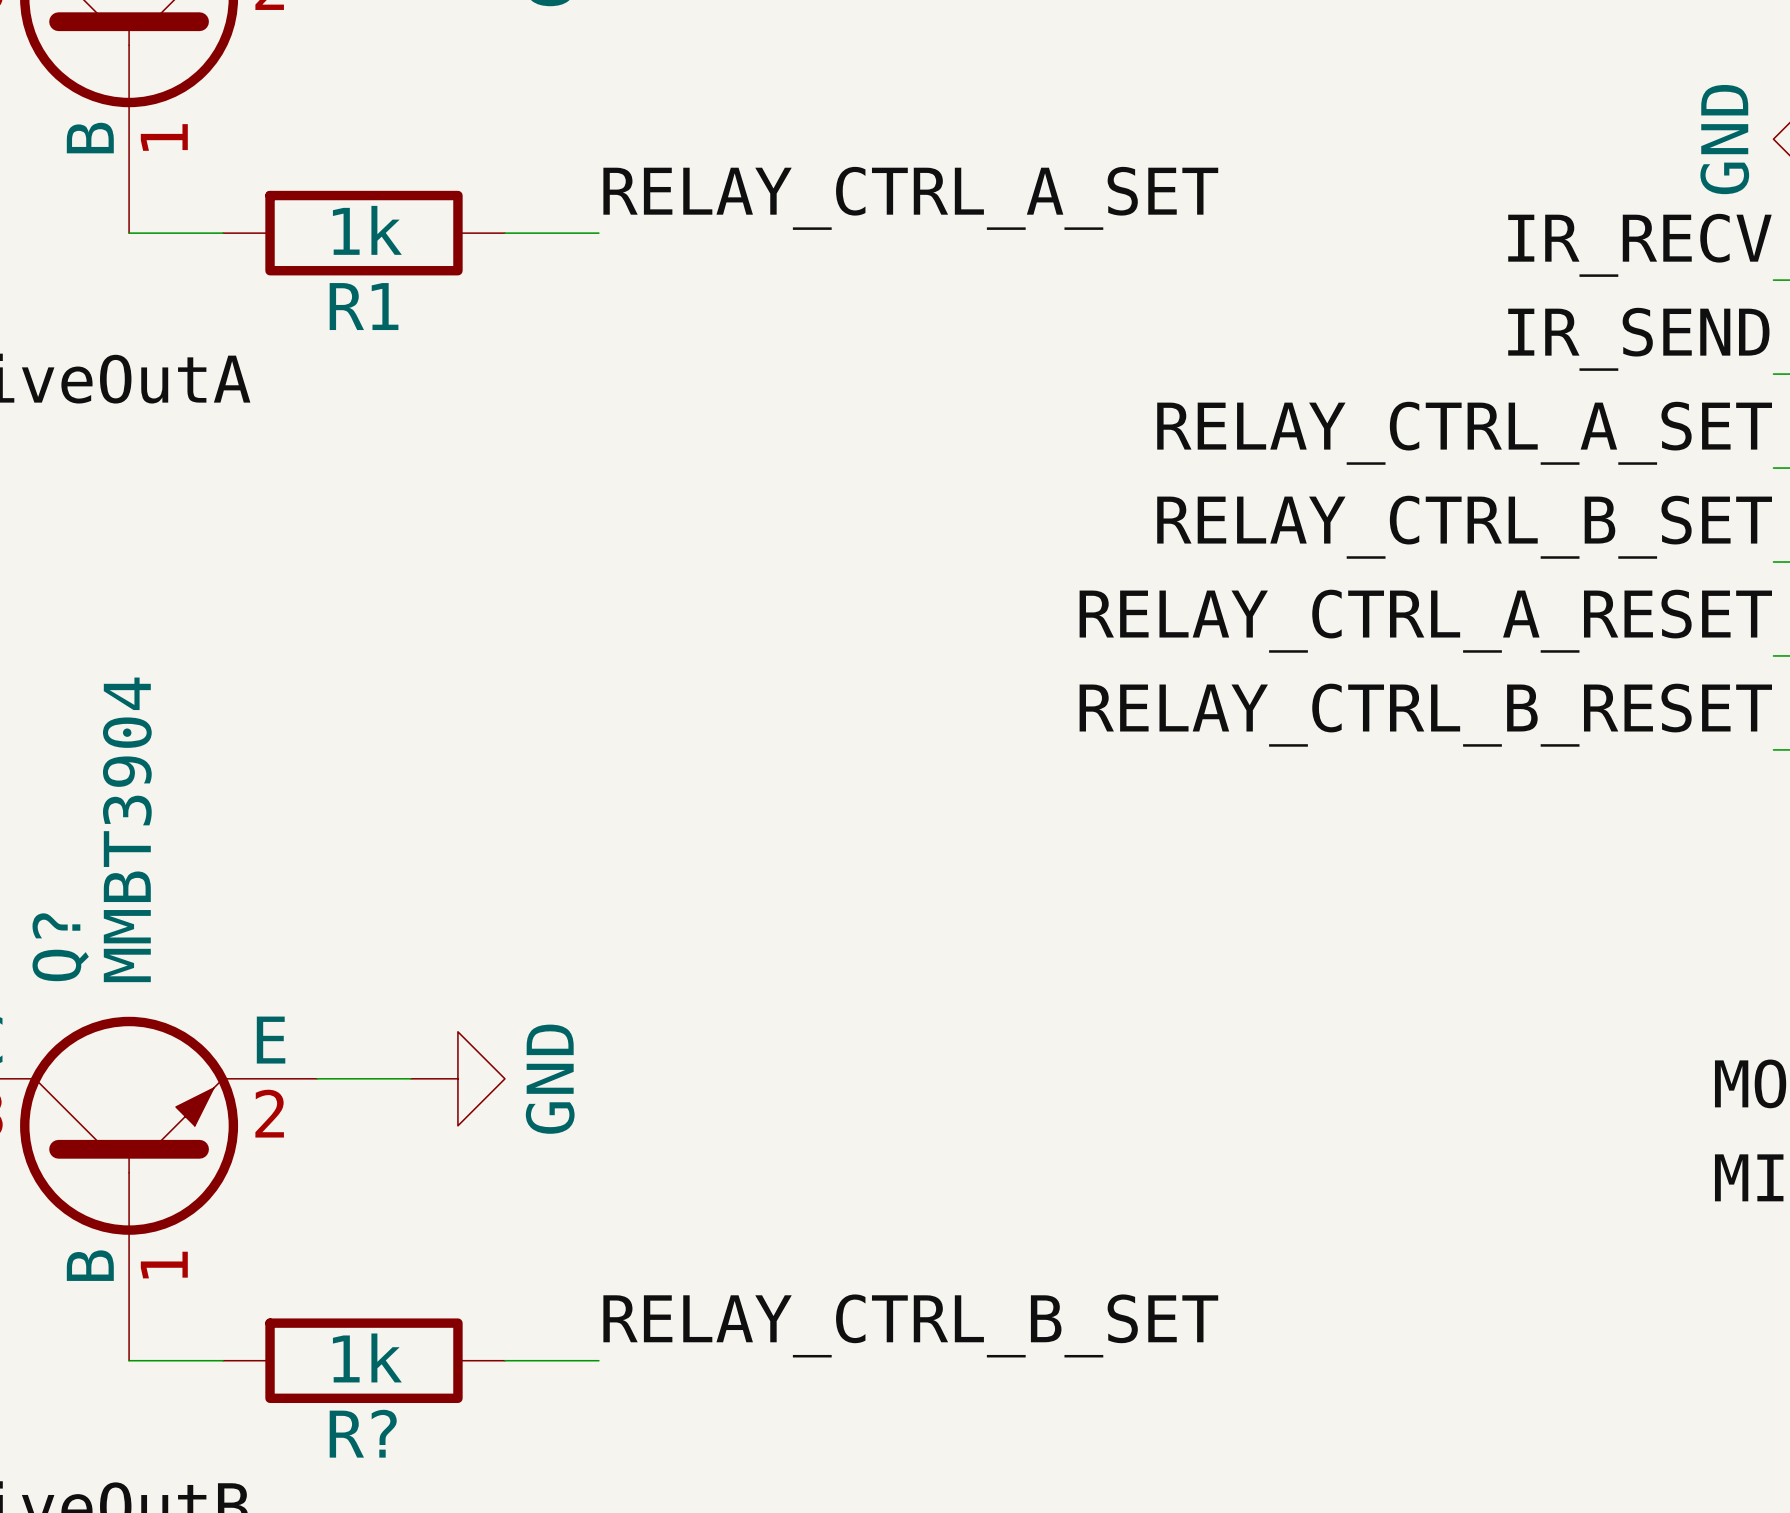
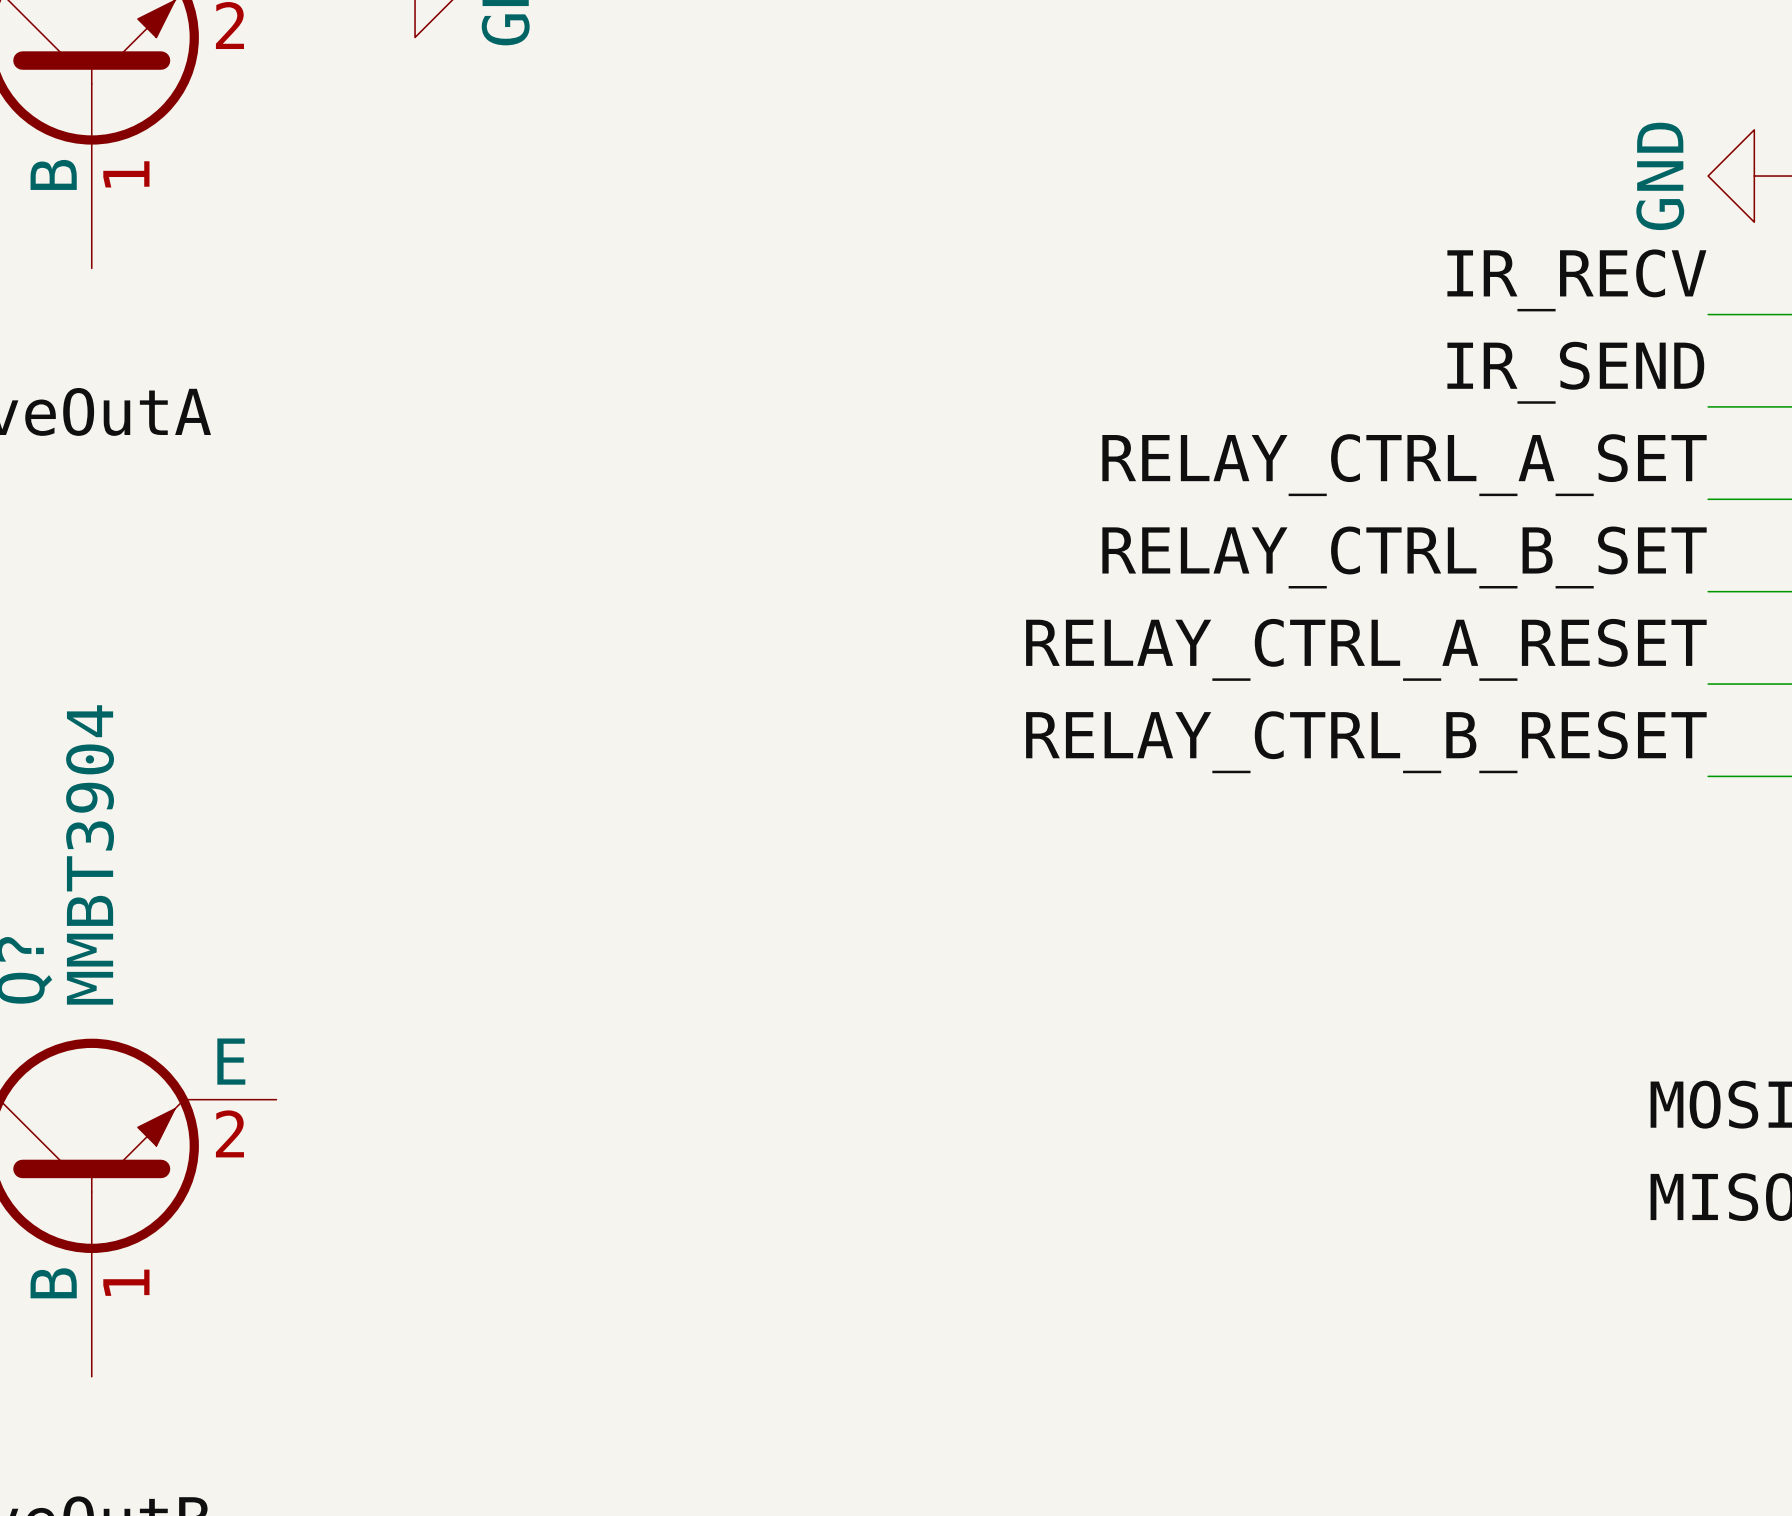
label: RELAY_CTRL_A_SET (910, 198) -> none
wire: (129, 233) (223, 233) -> none
R1: 1k (363, 233) -> none
wire: (504, 233) (598, 233) -> none
wire: (317, 1078) (410, 1078) -> none
power symbol: GND (457, 1078) -> none
label: RELAY_CTRL_B_SET (910, 1325) -> none
wire: (129, 1360) (223, 1360) -> none
R?: 1k (363, 1360) -> none
wire: (504, 1360) (598, 1360) -> none

